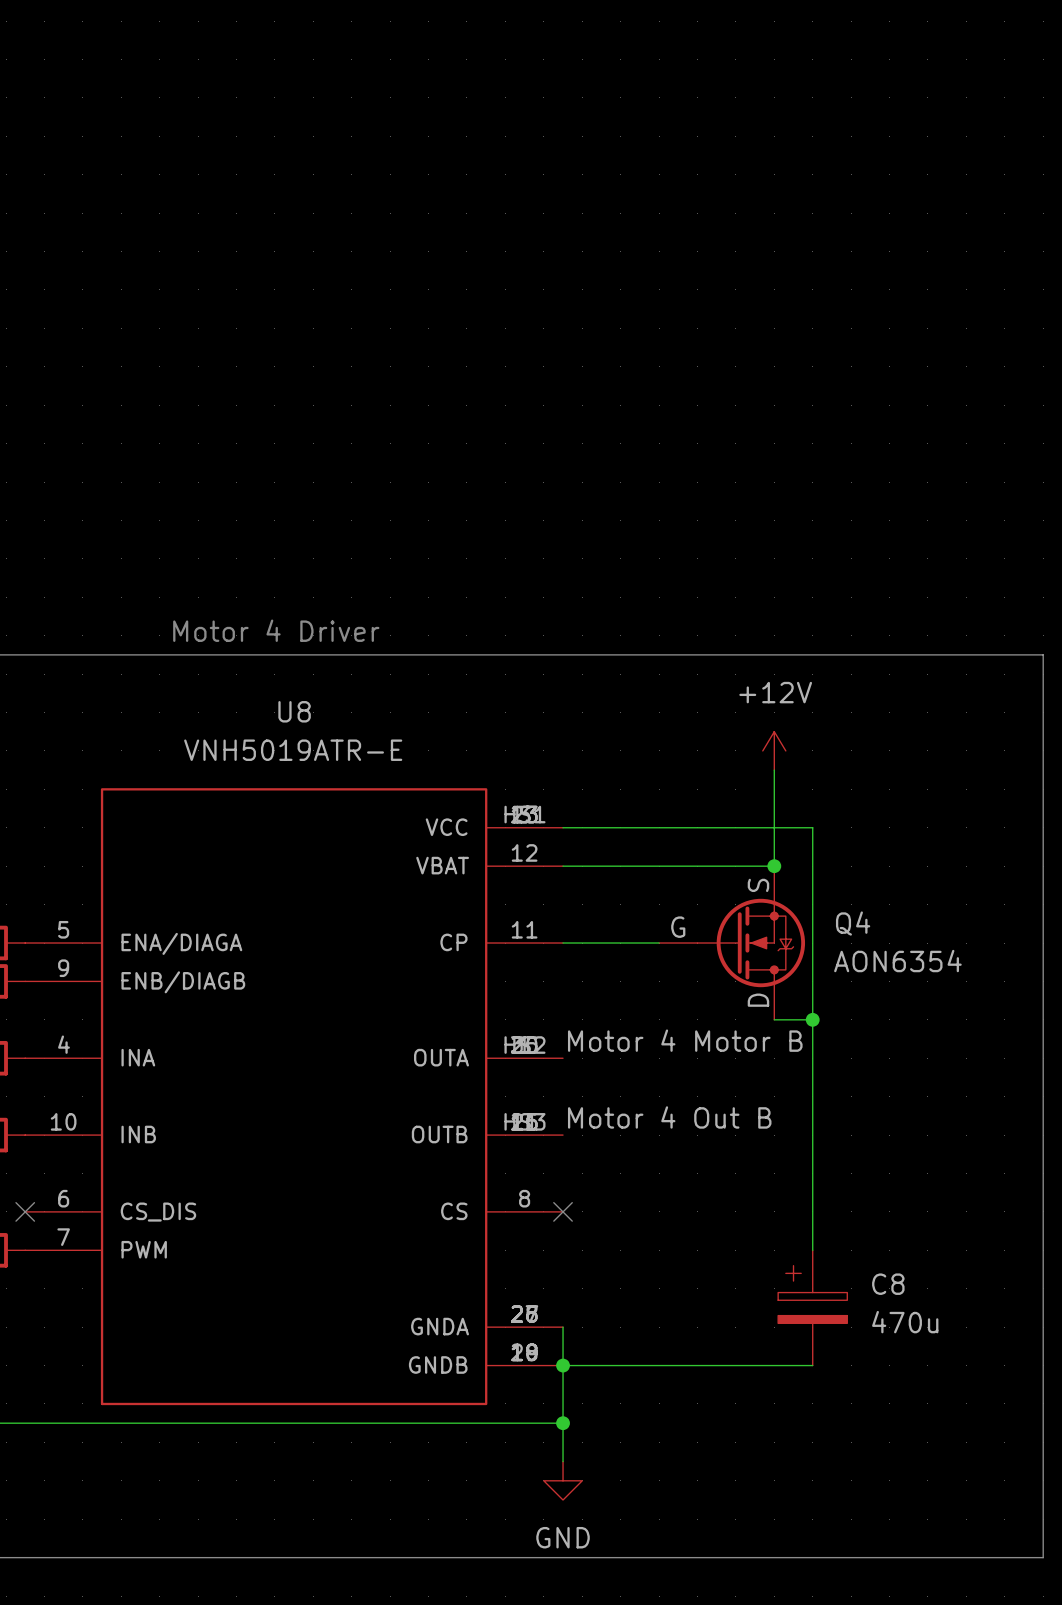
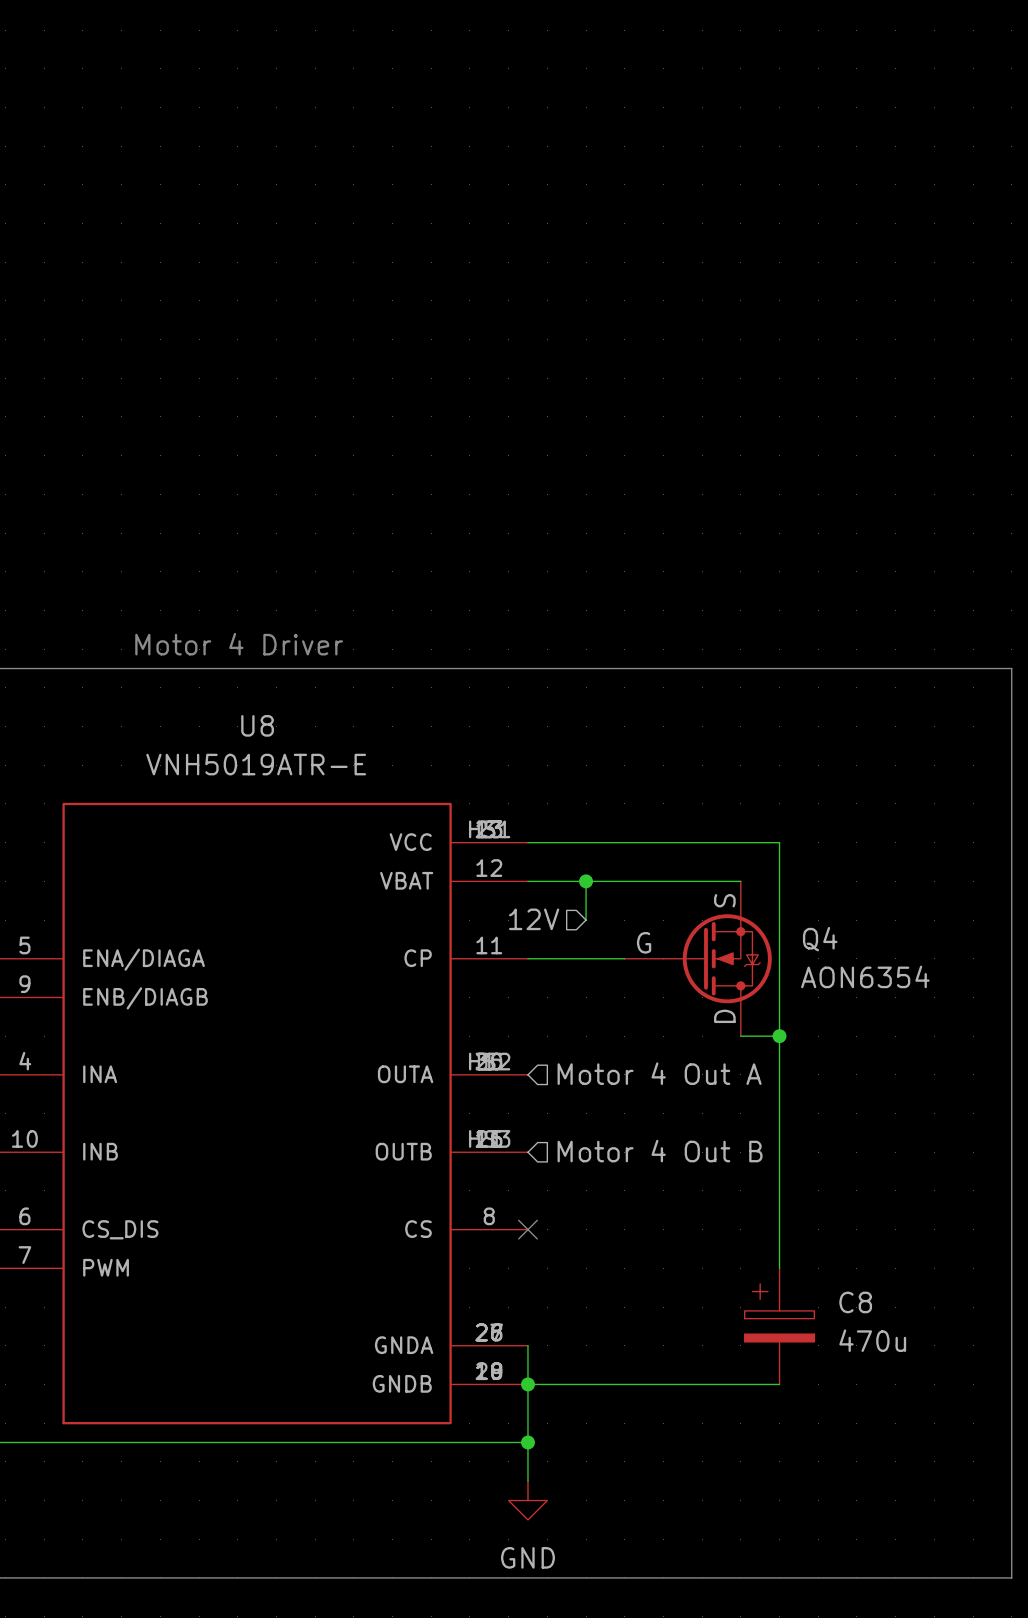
power symbol: +12V (774, 750) -> none
wire: (774, 770) (774, 866) -> none
wire: none -> (586, 881) (586, 920)
junction: none -> (586, 881)
junction: (774, 866) -> none
hierarchical label: none -> 12V (534, 919)
label: Motor 4 Motor B (685, 1040) -> none
hierarchical label: none -> Motor 4 Out A (659, 1073)
label: Motor 4 Out B (669, 1117) -> none
hierarchical label: none -> Motor 4 Out B (660, 1151)

